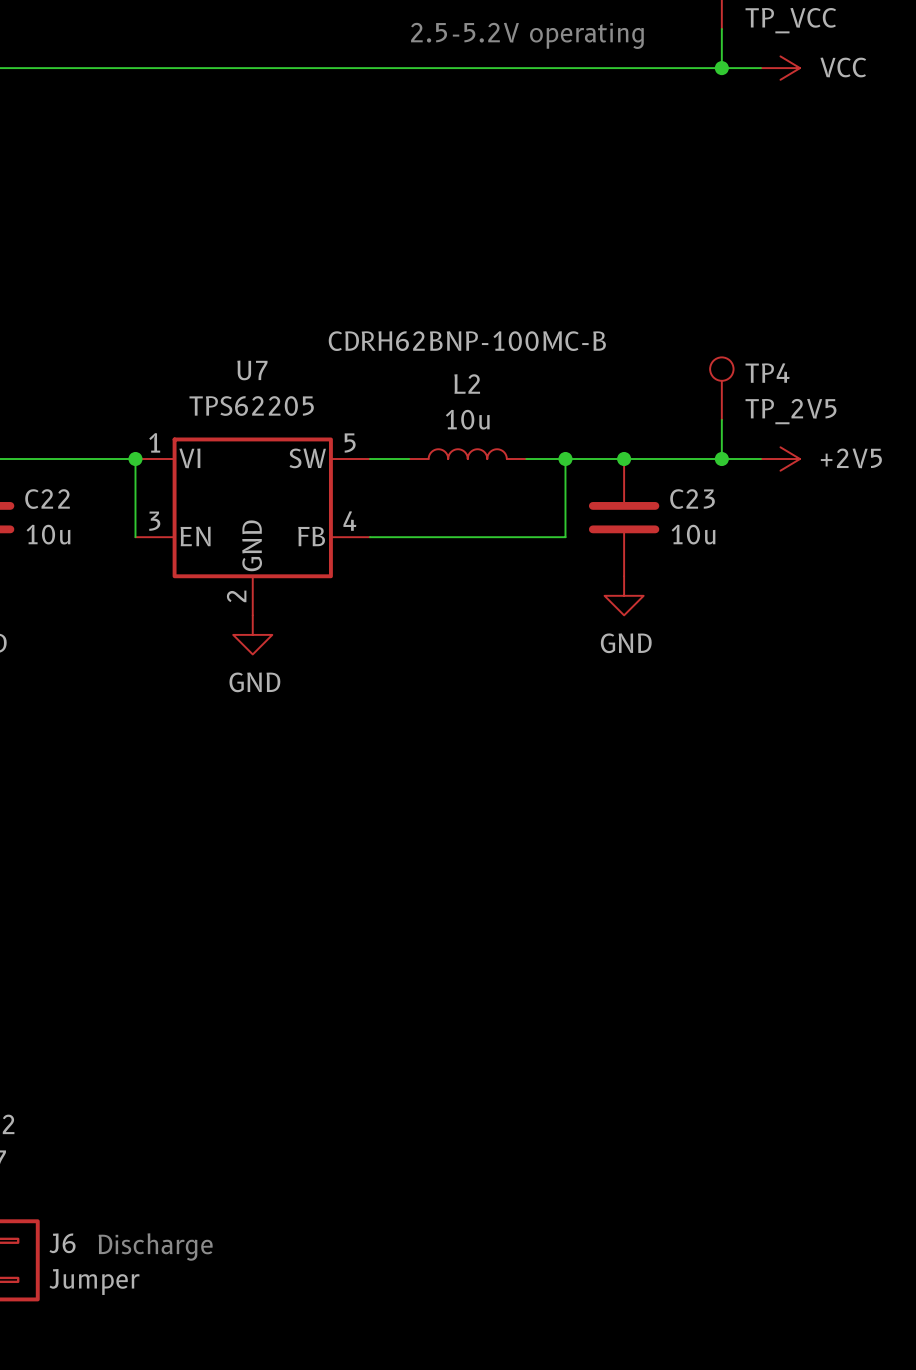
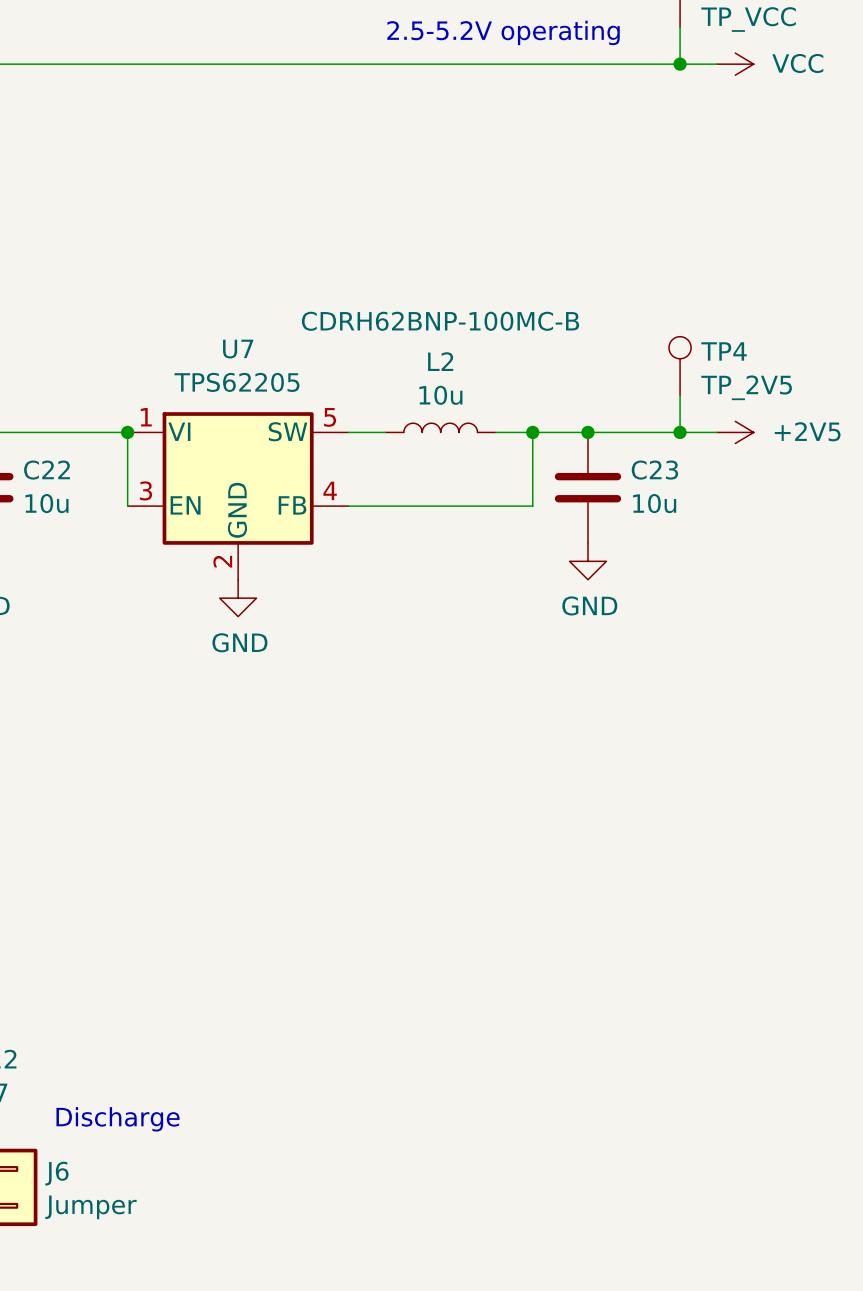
text position: Discharge (155, 1247) -> Discharge (118, 1119)

